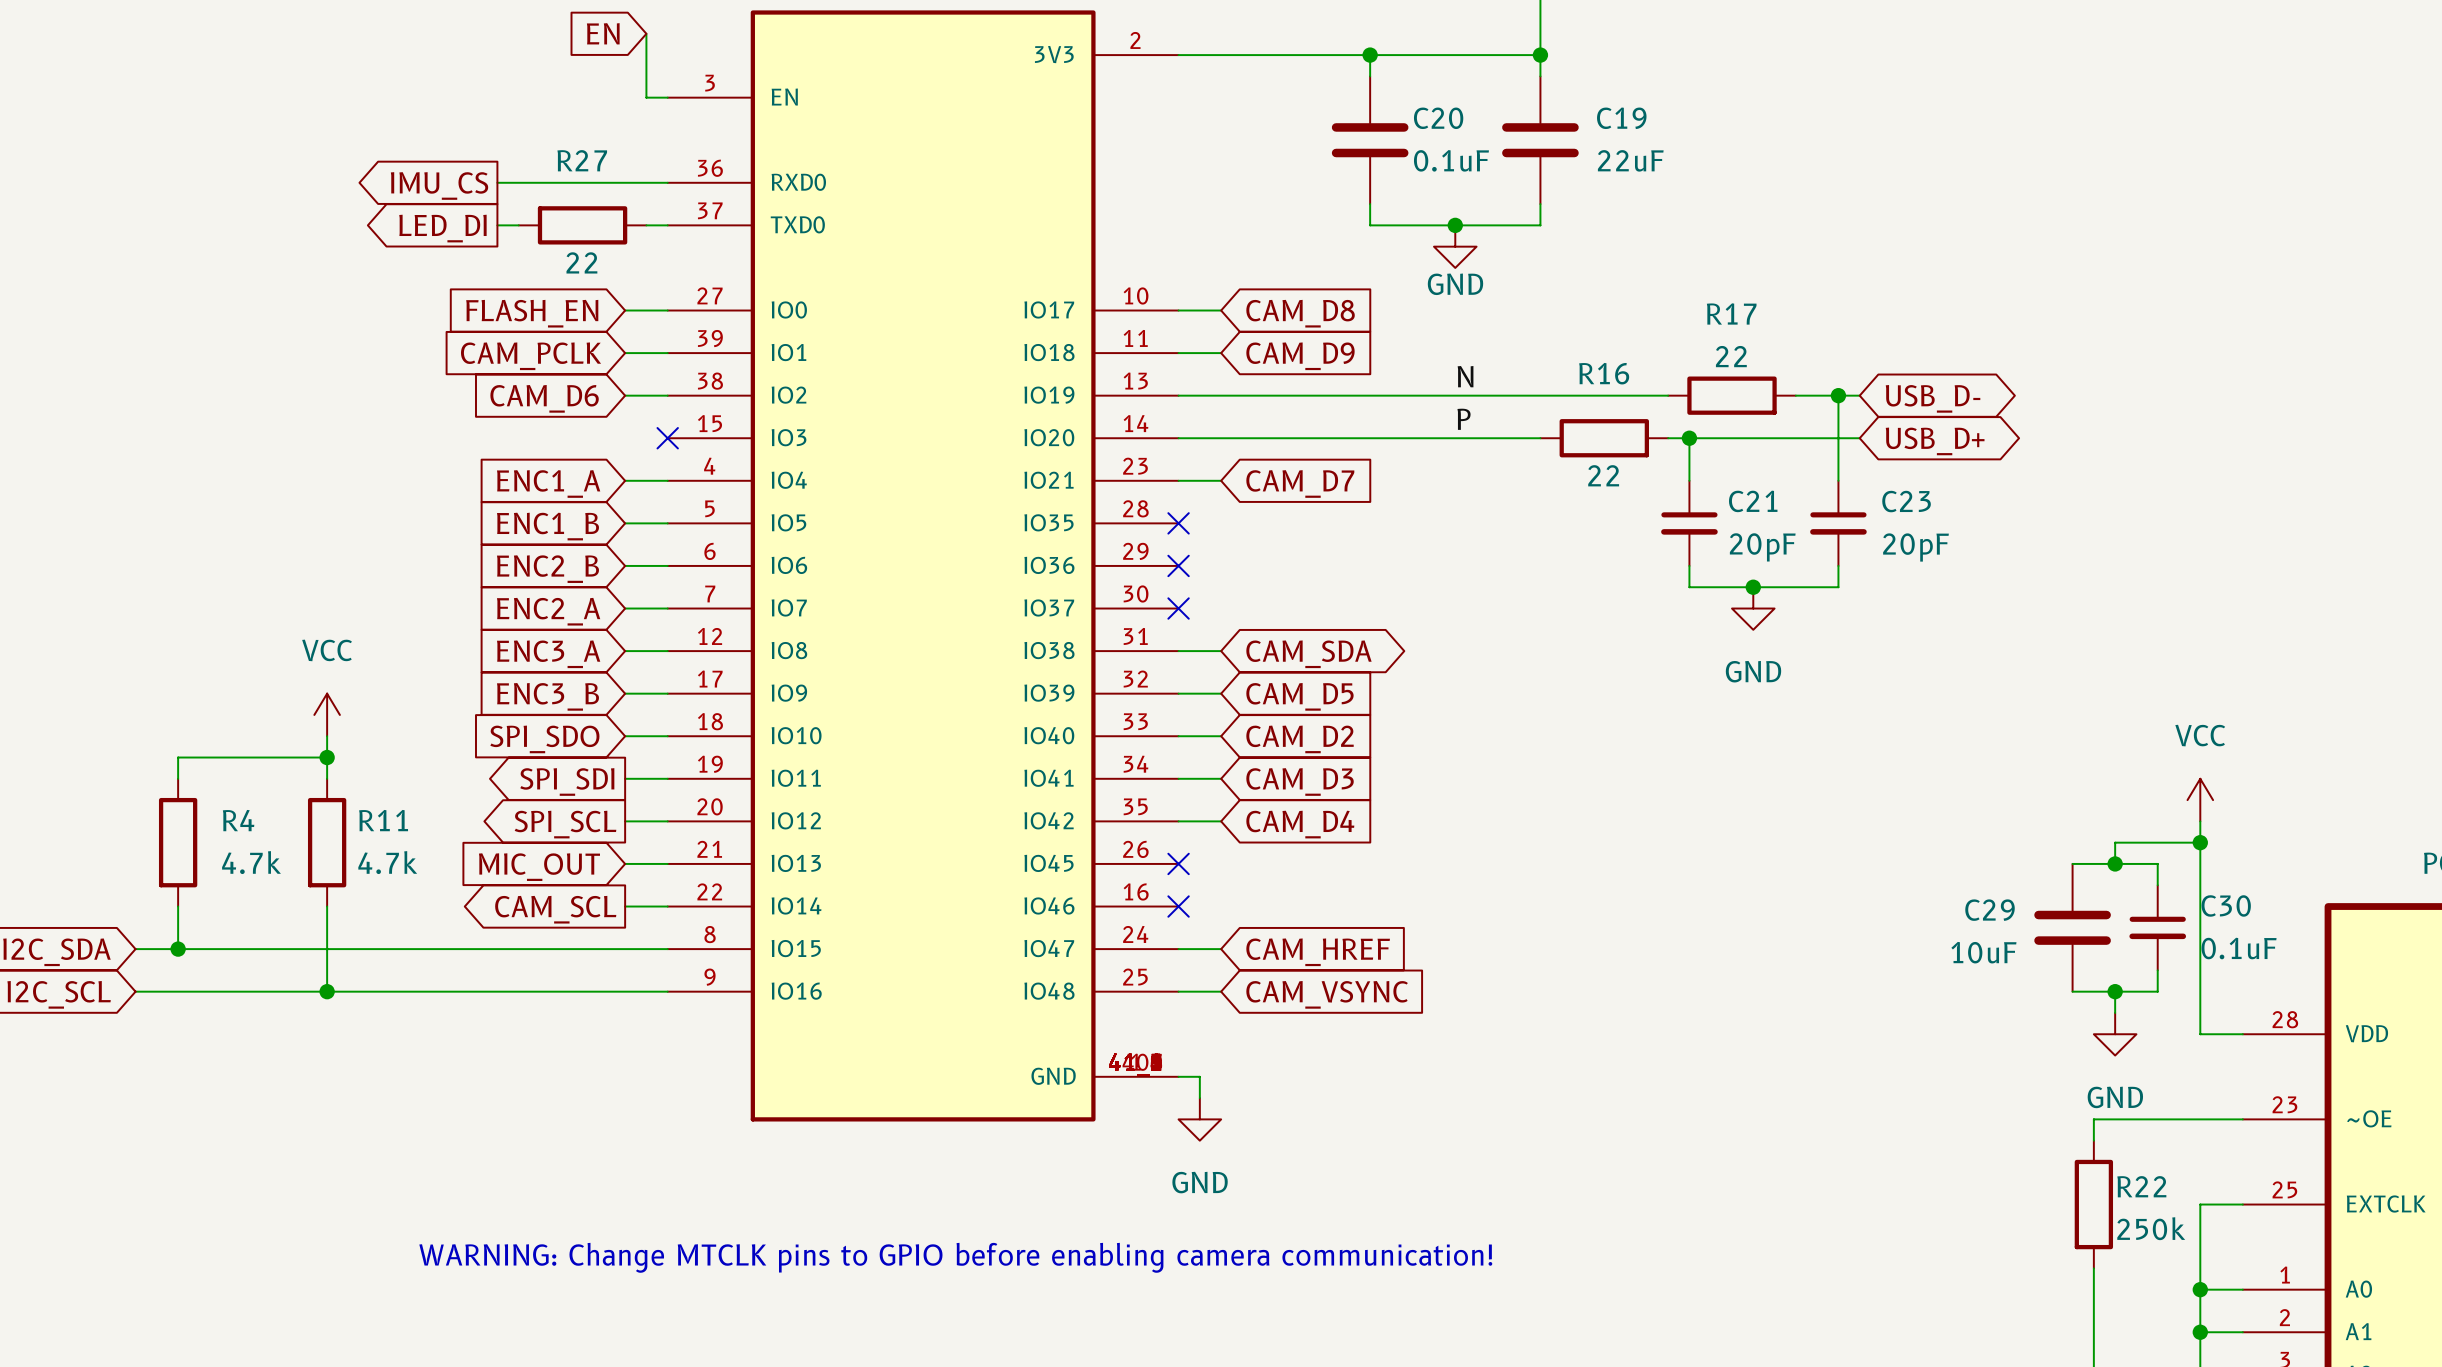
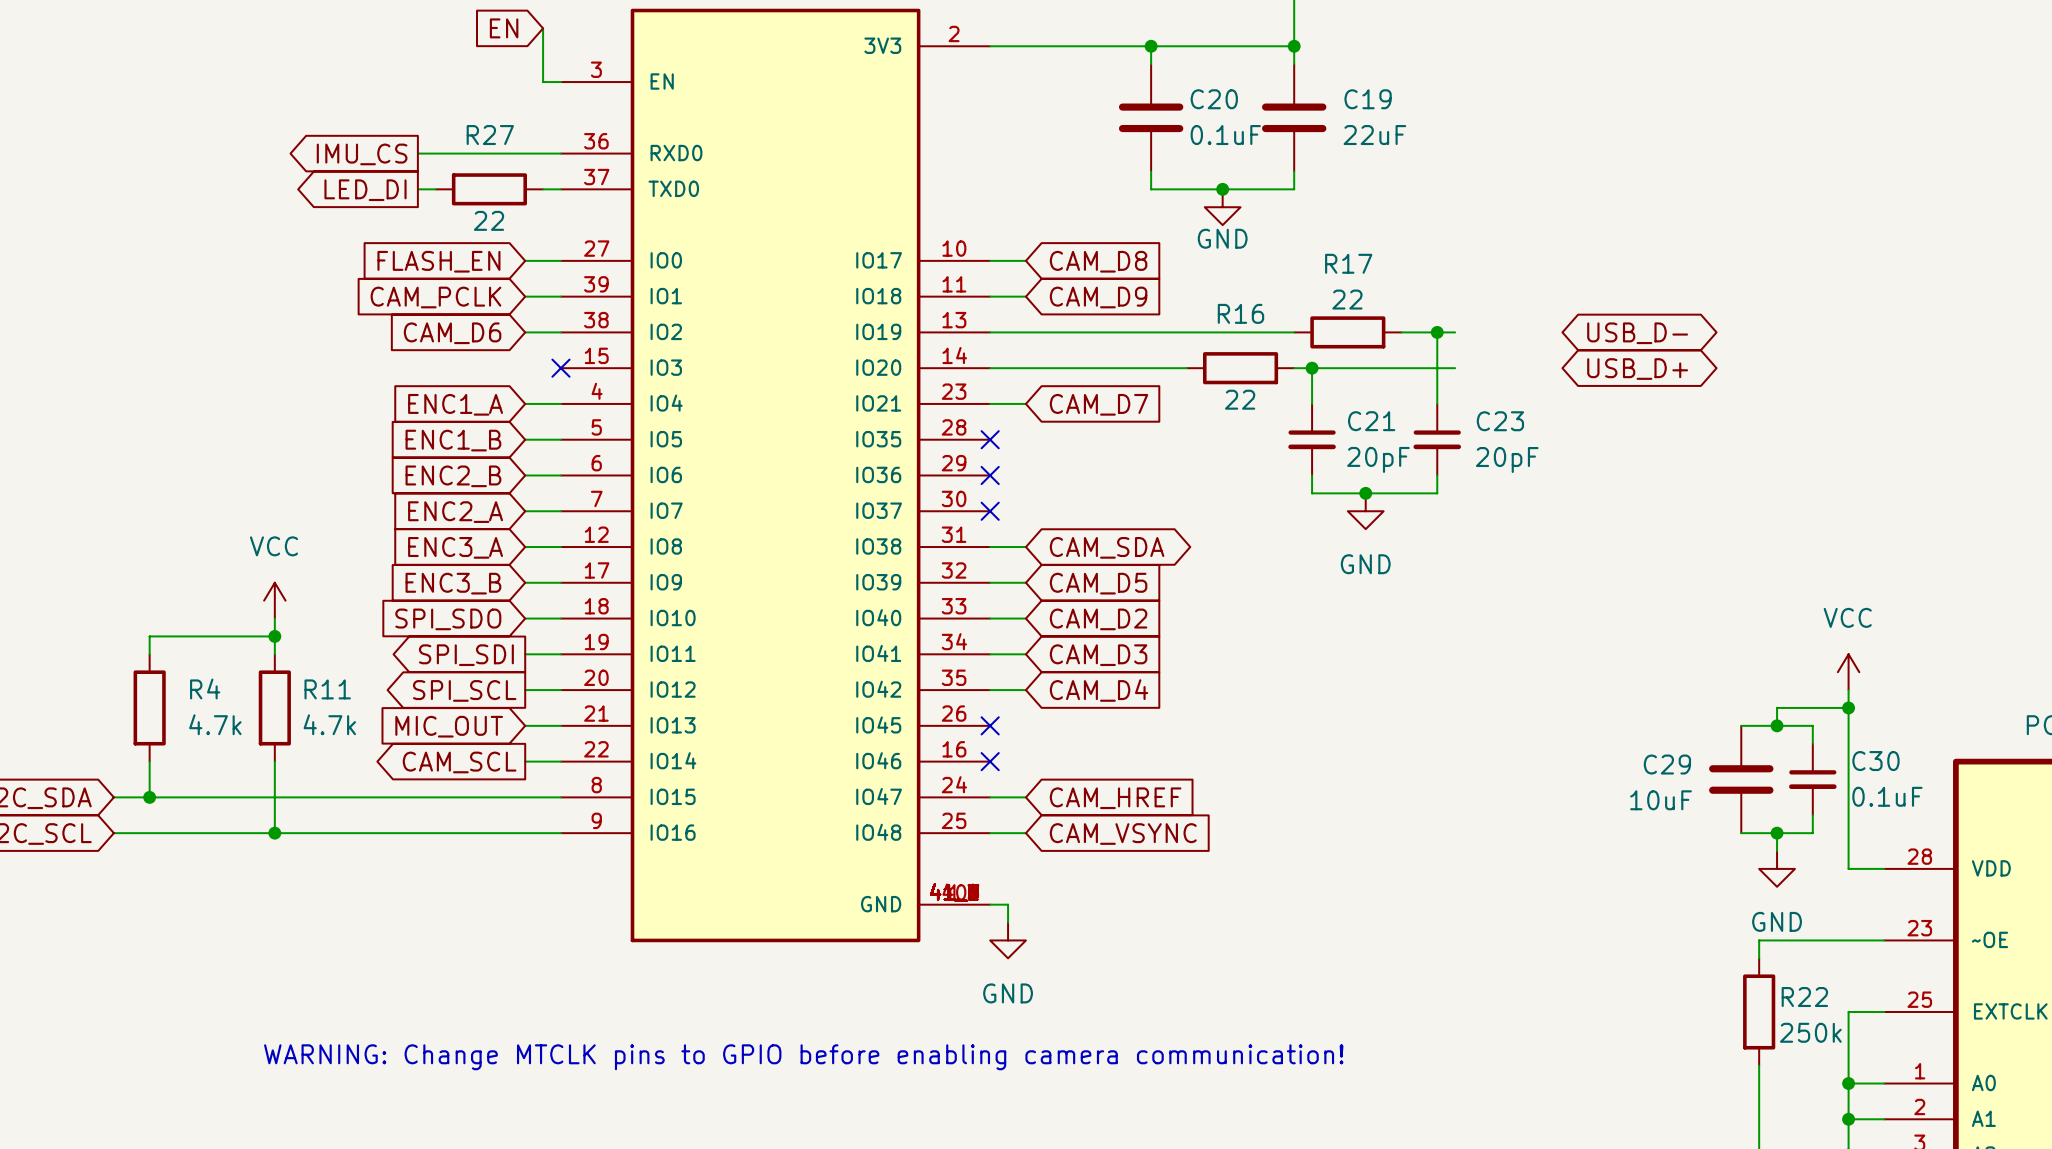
label: N (1465, 376) -> none
wire: (1540, 395) (1668, 395) -> (1455, 332) (1401, 332)
R17 position: (1732, 395) -> (1347, 332)
wire: (1795, 395) (1859, 395) -> none
wire: (1838, 395) (1838, 480) -> (1437, 332) (1437, 403)
junction: (1838, 395) -> none
label: P (1464, 419) -> none
wire: (1412, 438) (1540, 438) -> (1401, 368) (1294, 368)
junction: none -> (1312, 368)
R16 position: (1604, 438) -> (1240, 368)
wire: (1689, 438) (1689, 480) -> (1312, 368) (1312, 403)
junction position: (1689, 438) -> (1437, 332)
wire: (1732, 438) (1859, 438) -> none
C21 position: (1689, 523) -> (1312, 439)
C23 position: (1838, 523) -> (1437, 439)
wire: (1689, 565) (1689, 587) -> (1312, 475) (1312, 493) (1419, 493)
wire: (1838, 565) (1838, 587) (1710, 587) -> (1437, 475) (1437, 493)
junction: none -> (1365, 493)
junction: (1753, 587) -> none
power symbol position: GND (1753, 608) -> GND (1365, 511)

